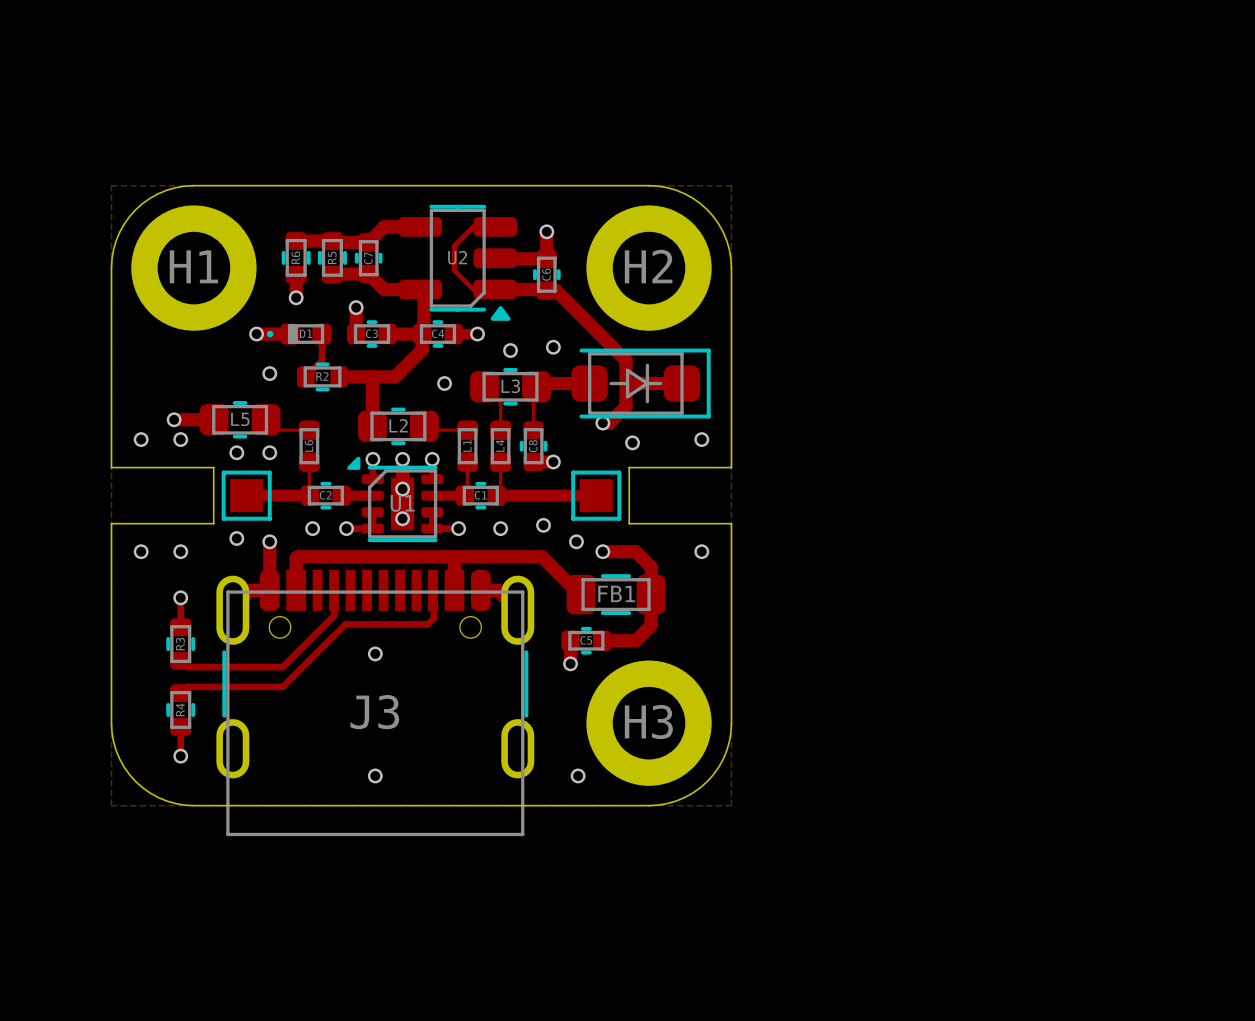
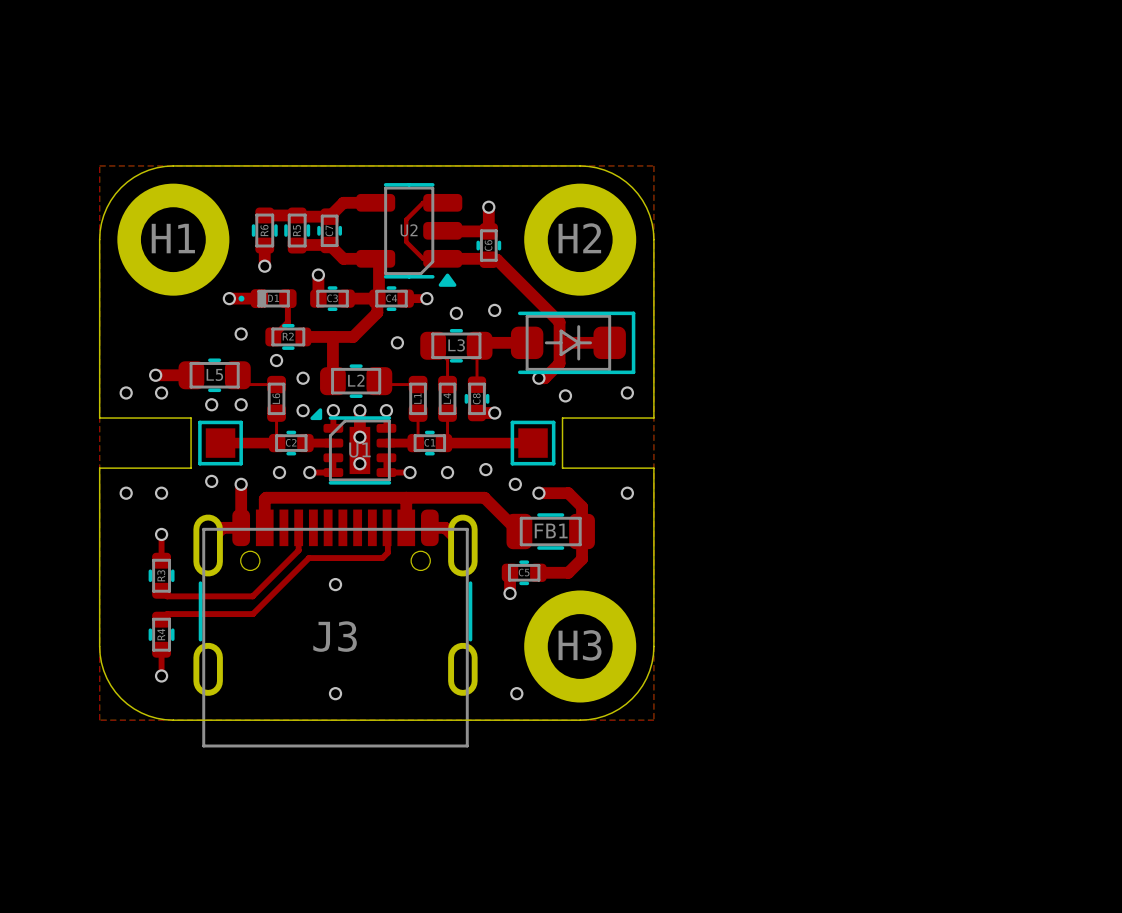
via: none -> (276, 360)
via: none -> (303, 378)
via: none -> (303, 410)

